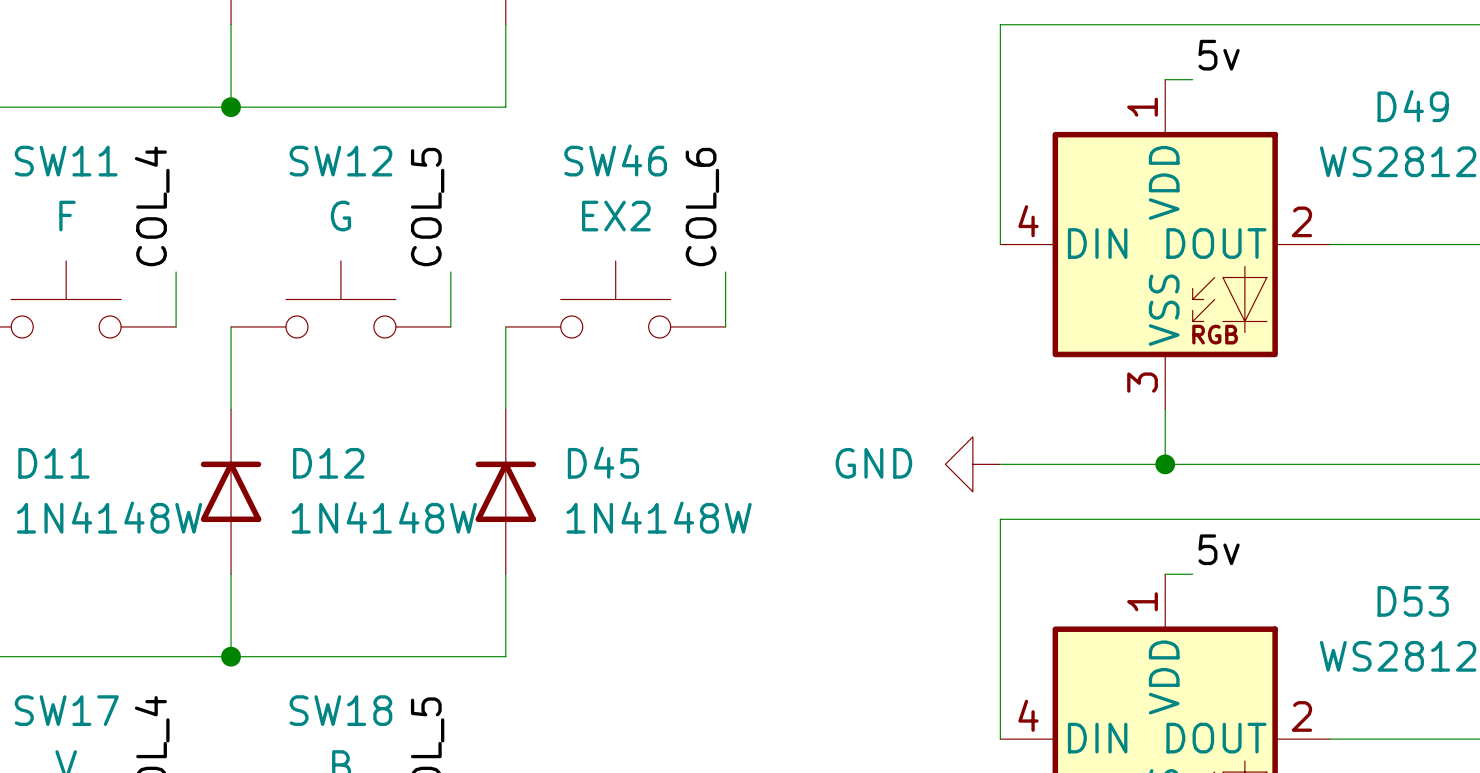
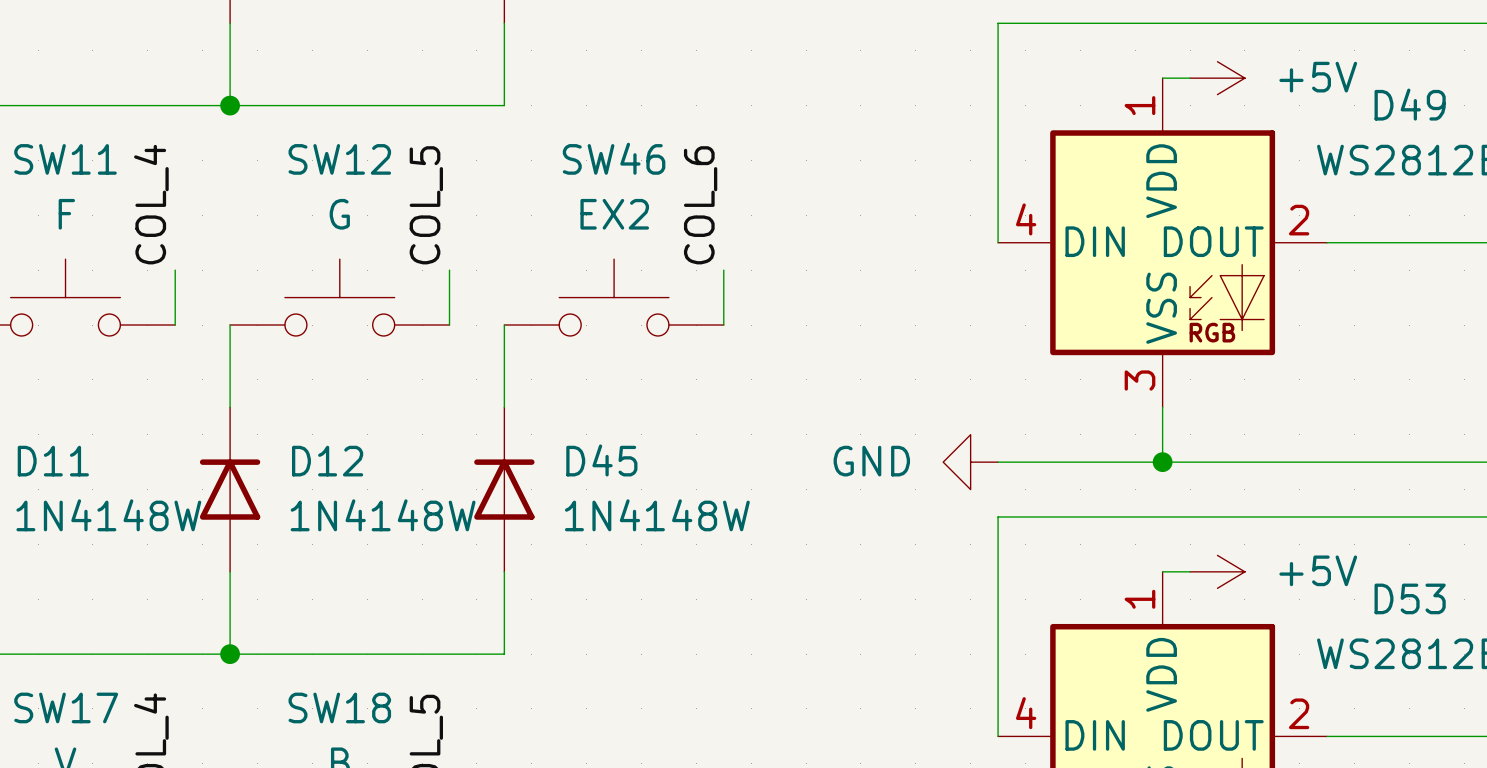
label: 5v (1219, 55) -> none
power symbol: none -> +5V (1217, 78)
label: 5v (1219, 549) -> none
power symbol: none -> +5V (1217, 571)

